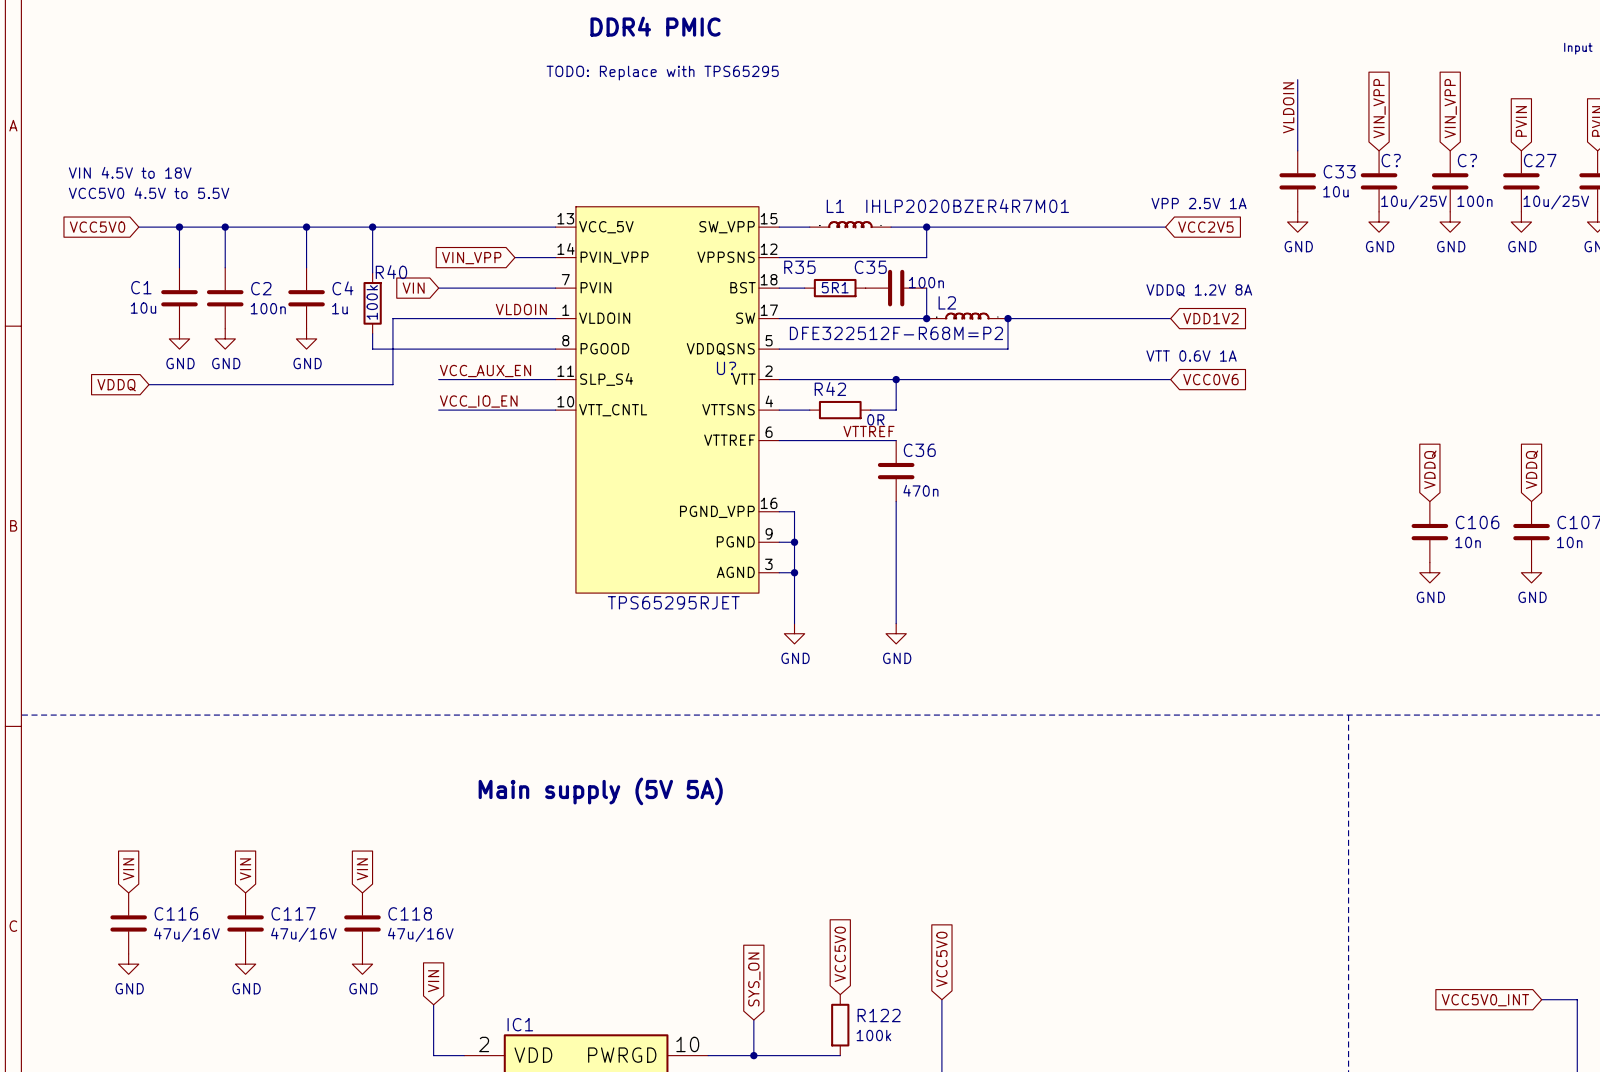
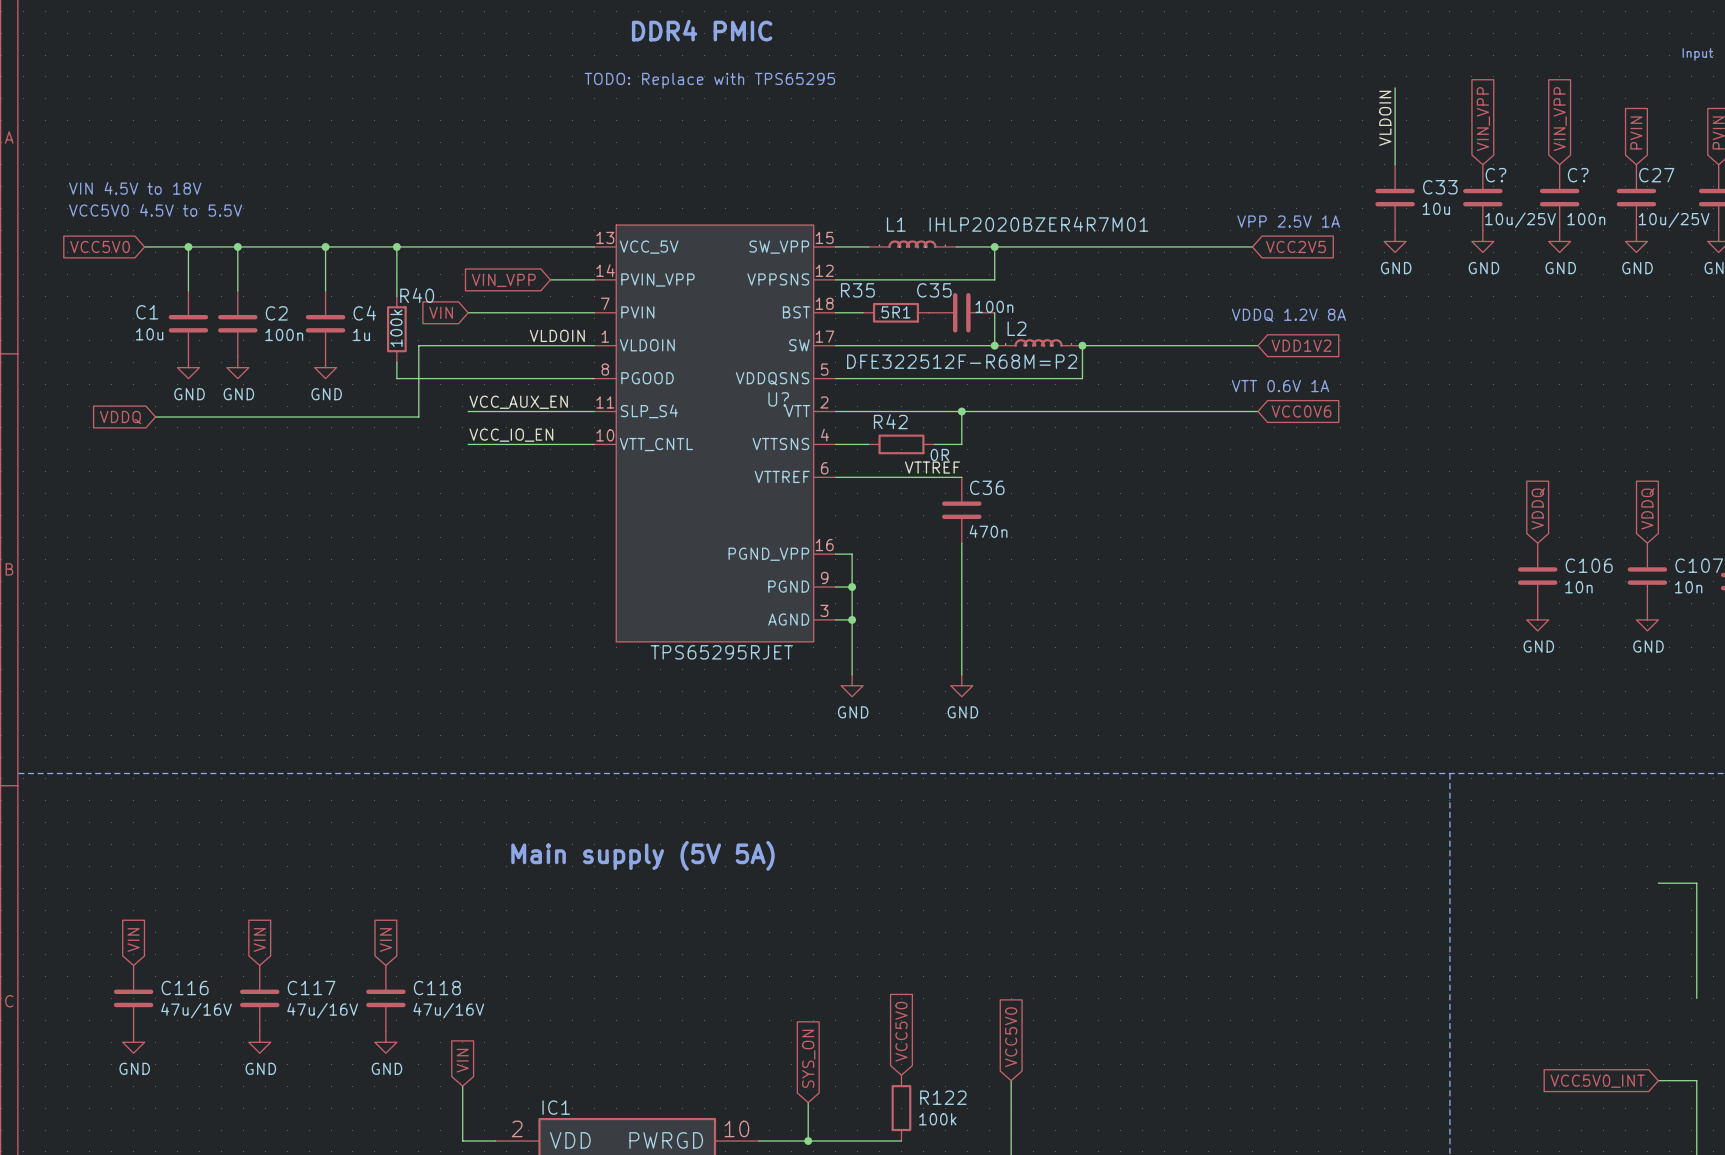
wire: none -> (1658, 883) (1696, 883) (1696, 998)

